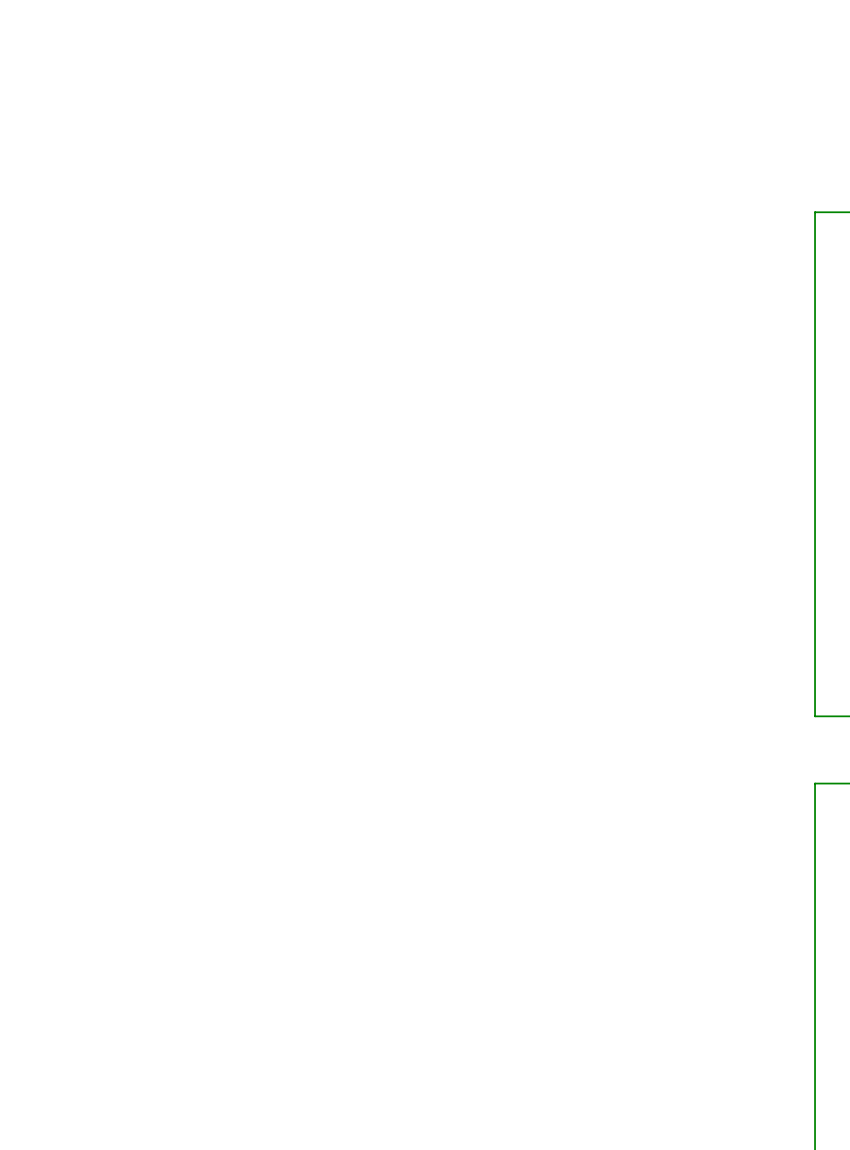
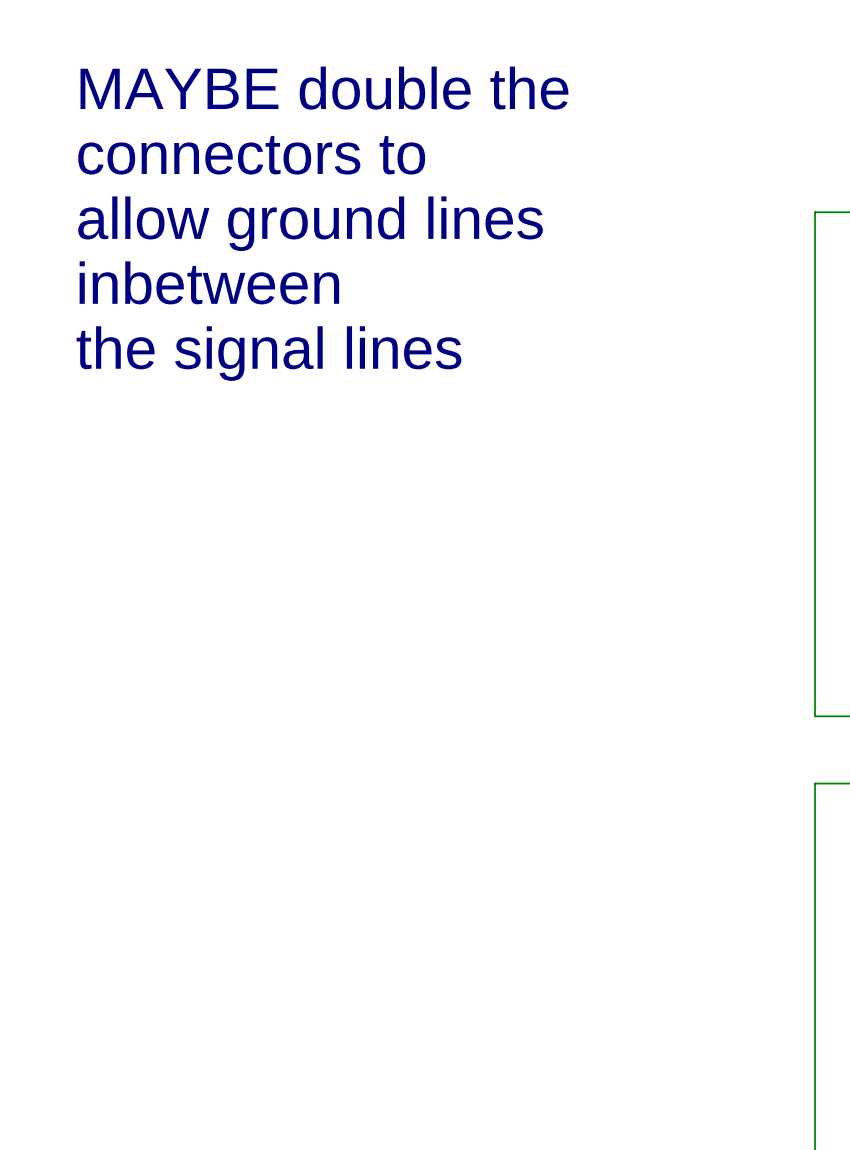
text: none -> MAYBE double the (324, 88)
text: none -> connectors to (251, 155)
text: none -> allow ground lines (310, 223)
text: none -> inbetween (209, 282)
text: none -> the signal lines (268, 353)

